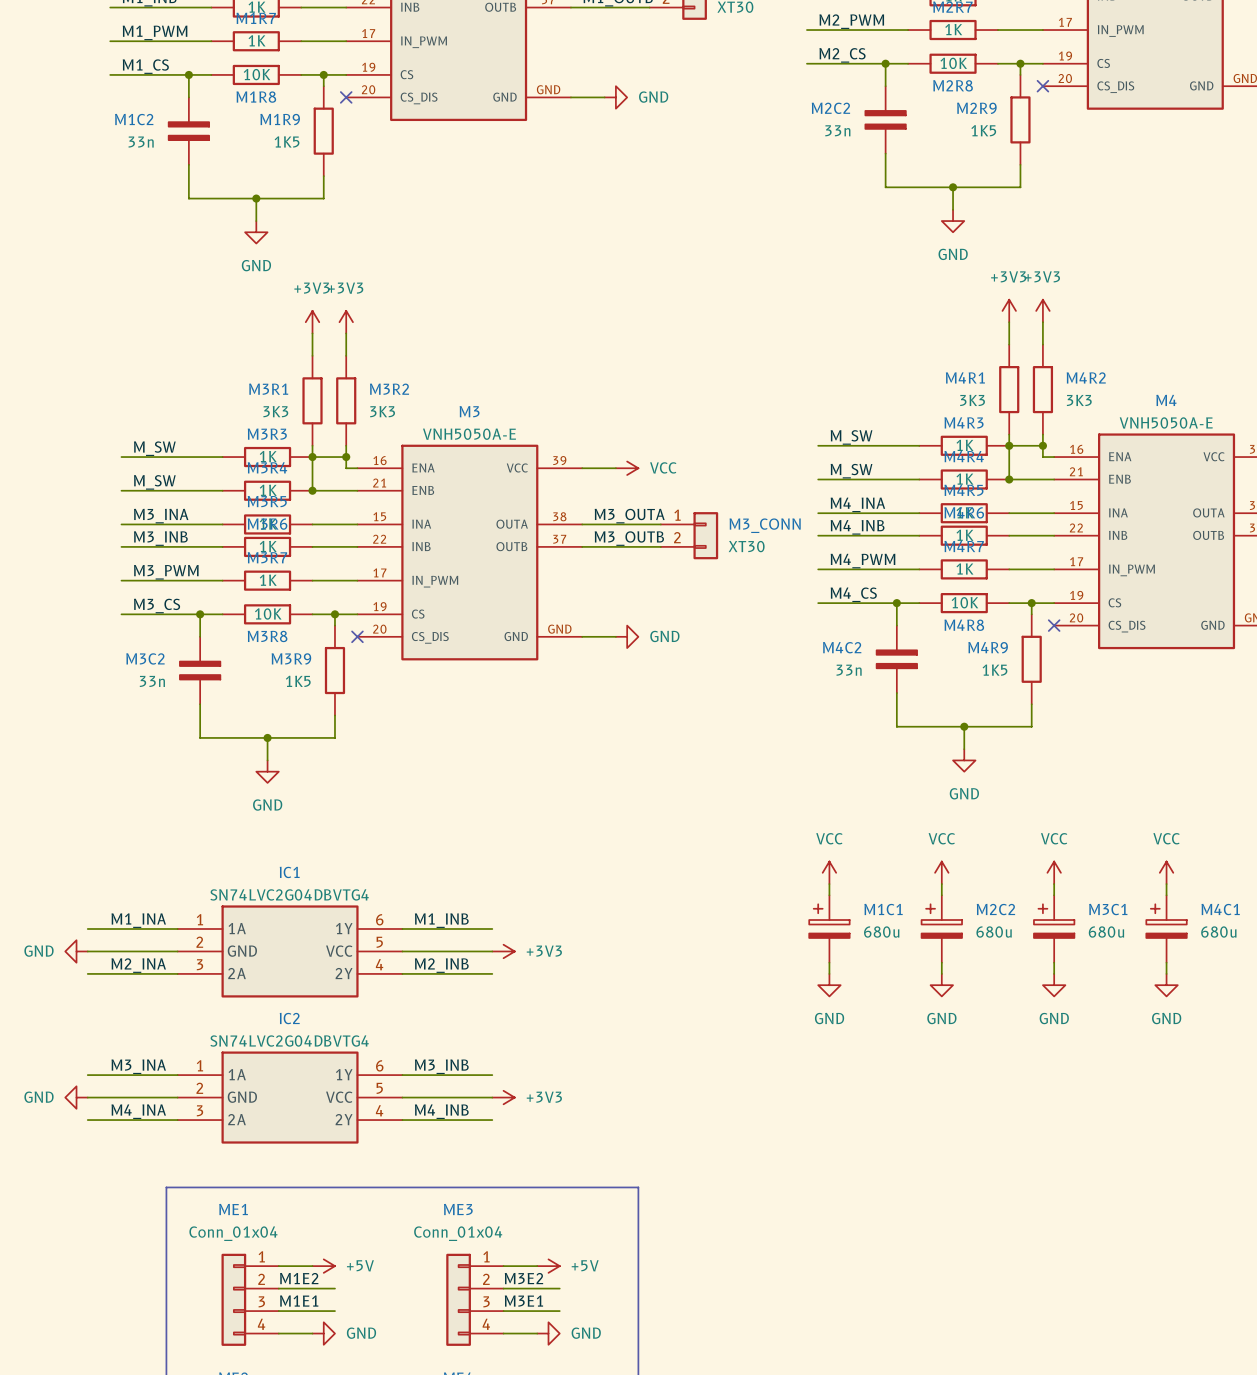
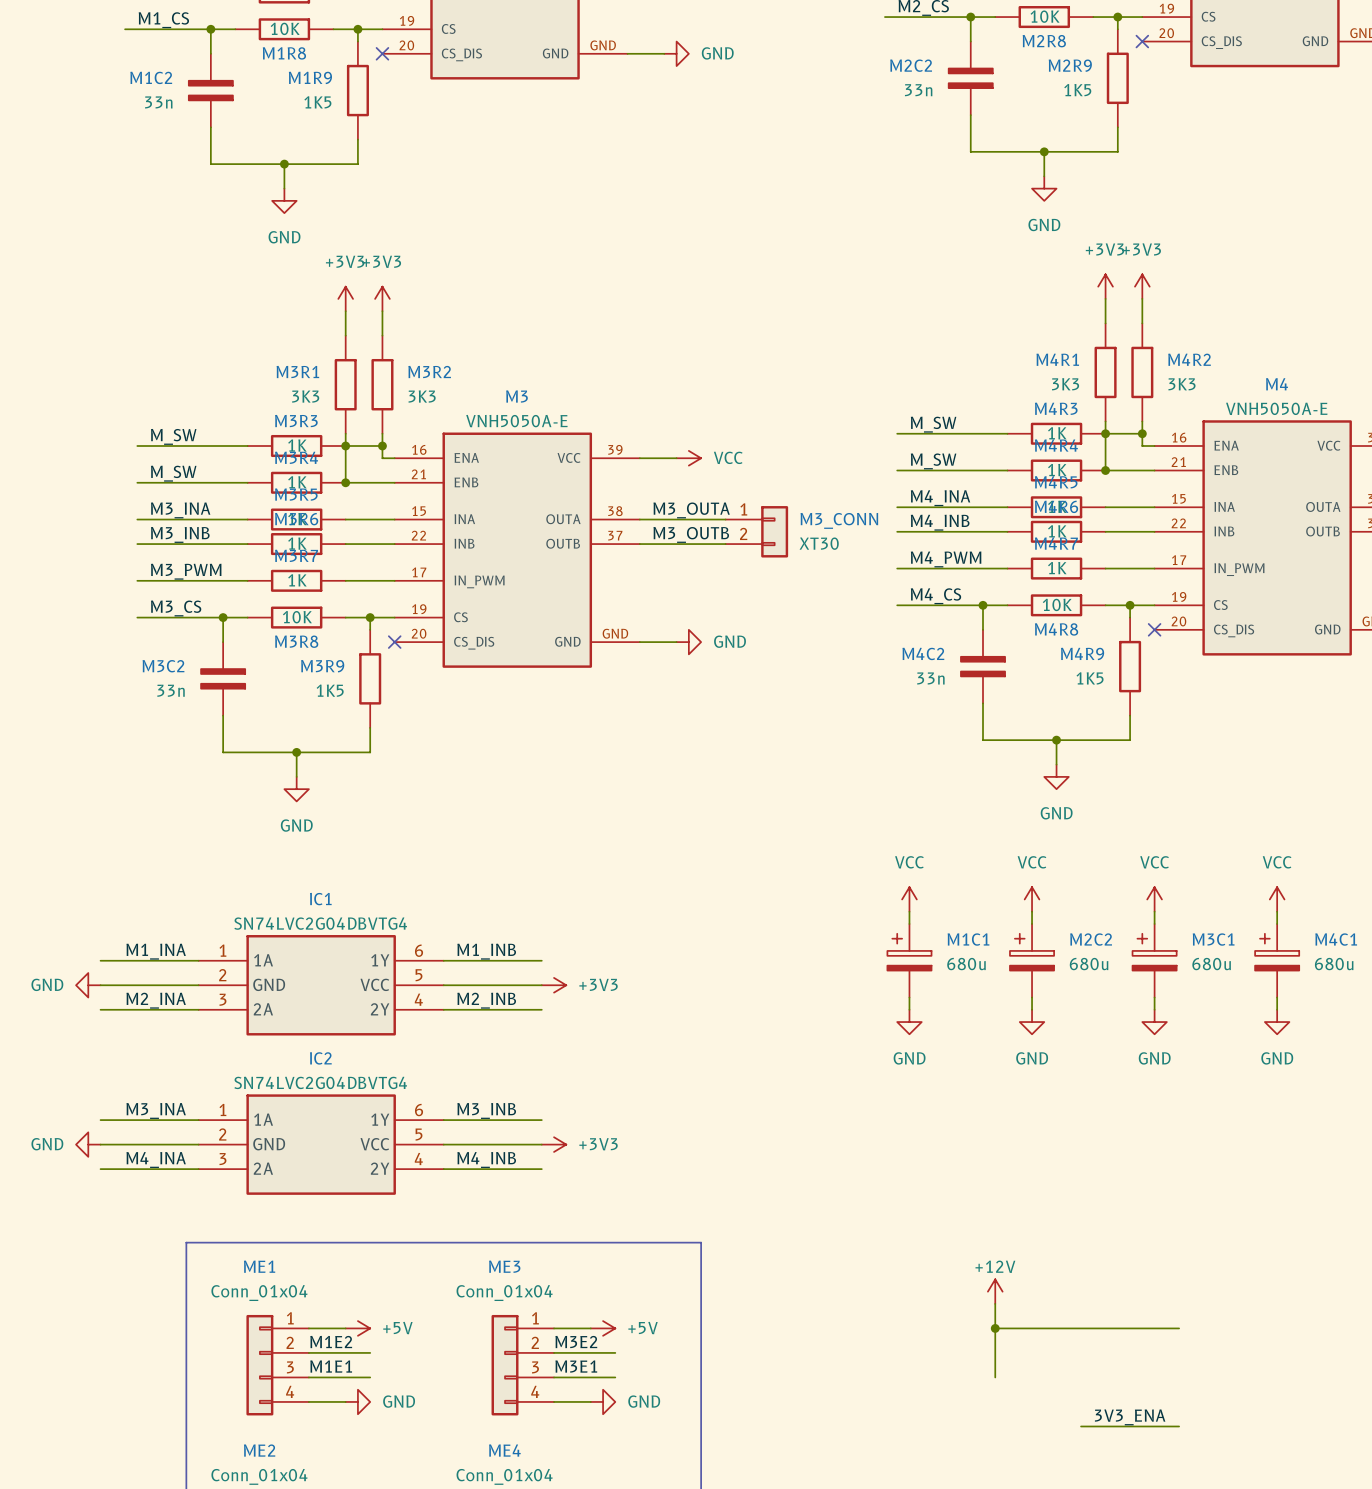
power symbol: none -> +12V (995, 1291)
wire: none -> (995, 1303) (995, 1377)
wire: none -> (995, 1328) (1179, 1328)
junction: none -> (995, 1328)
label: none -> 3V3_ENA (1130, 1417)
wire: none -> (1081, 1426) (1179, 1426)

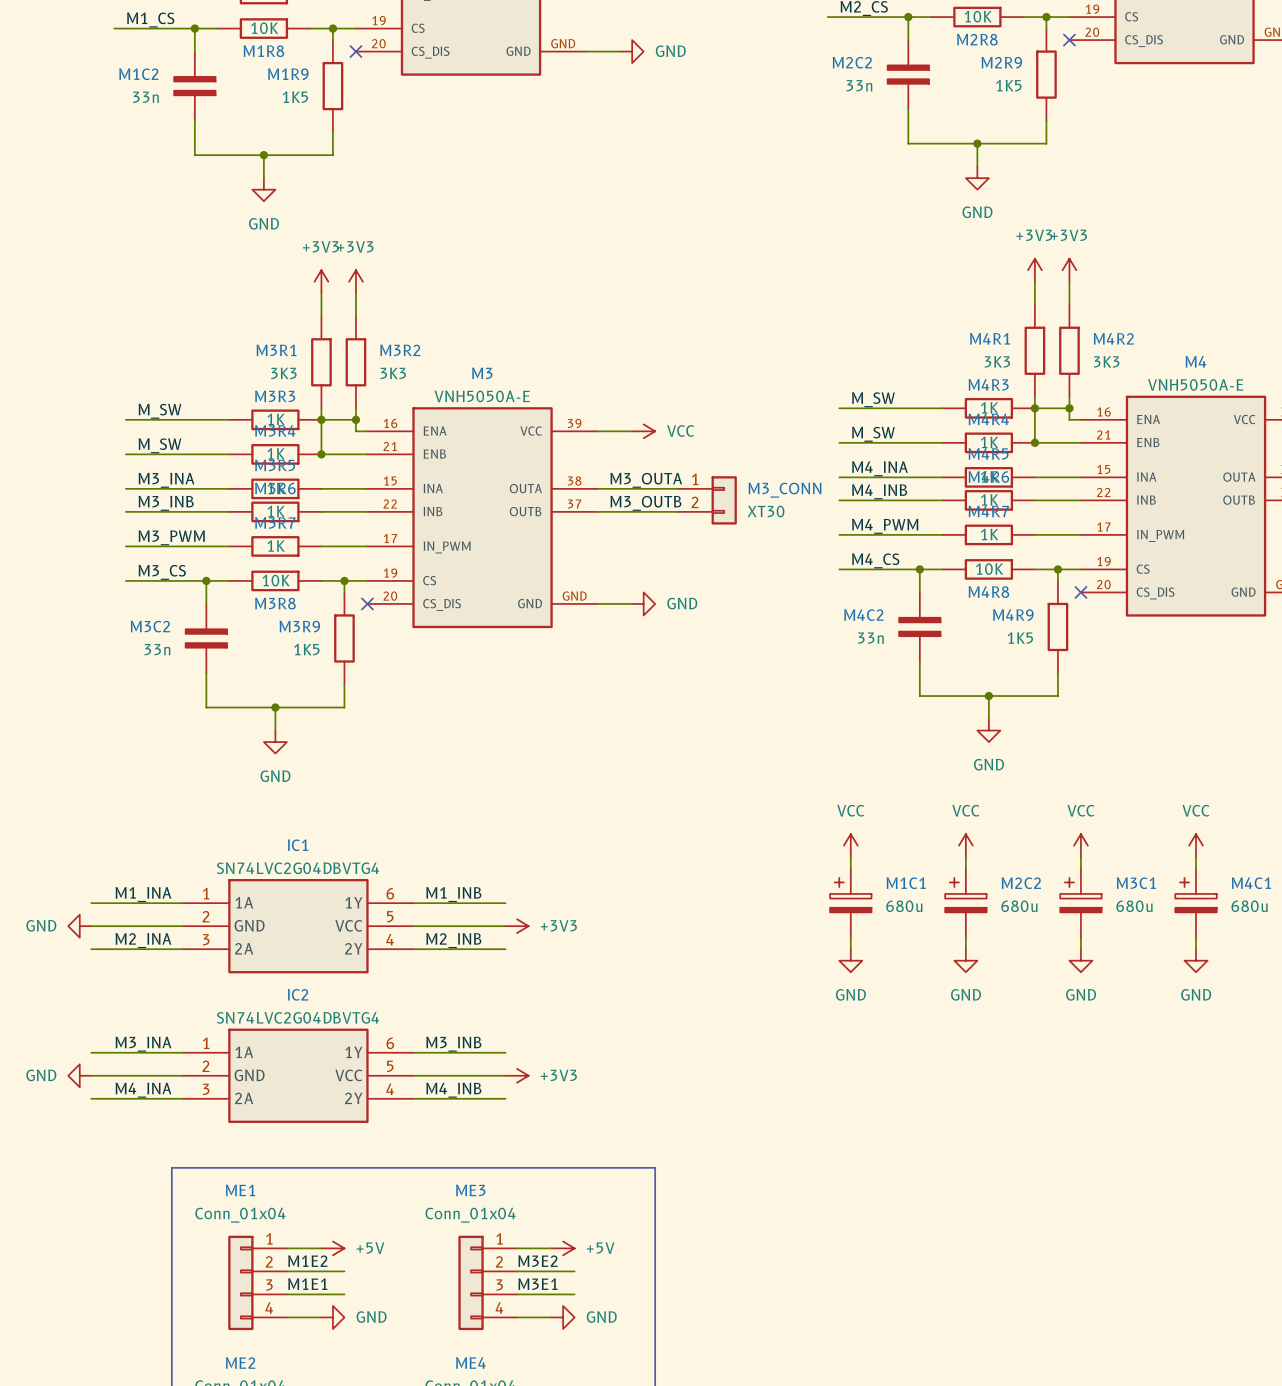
power symbol: +12V (995, 1291) -> none
wire: (995, 1303) (995, 1377) -> none
wire: (995, 1328) (1179, 1328) -> none
junction: (995, 1328) -> none
label: 3V3_ENA (1130, 1417) -> none
wire: (1081, 1426) (1179, 1426) -> none

